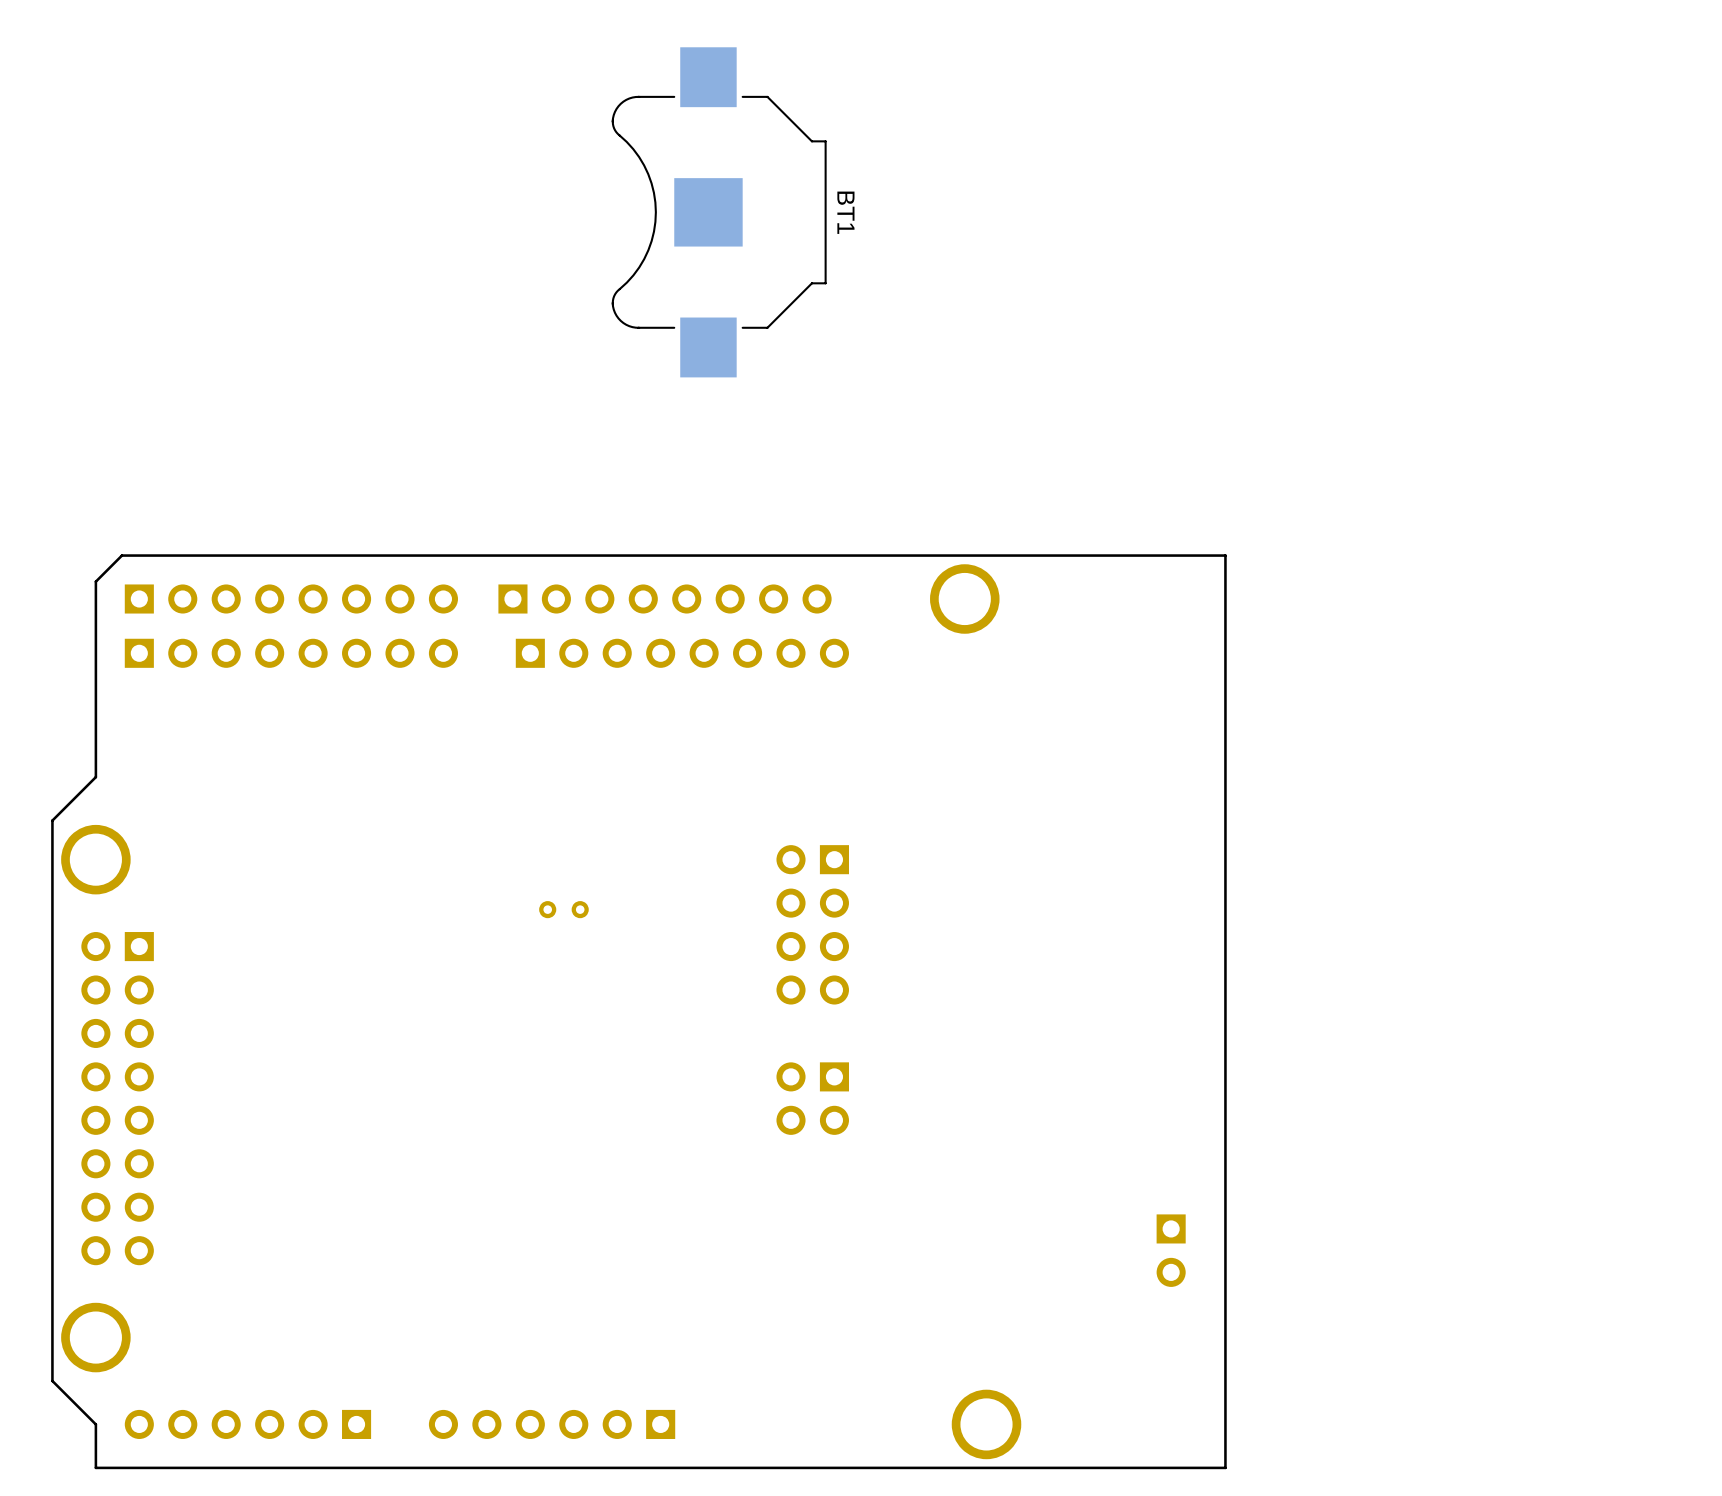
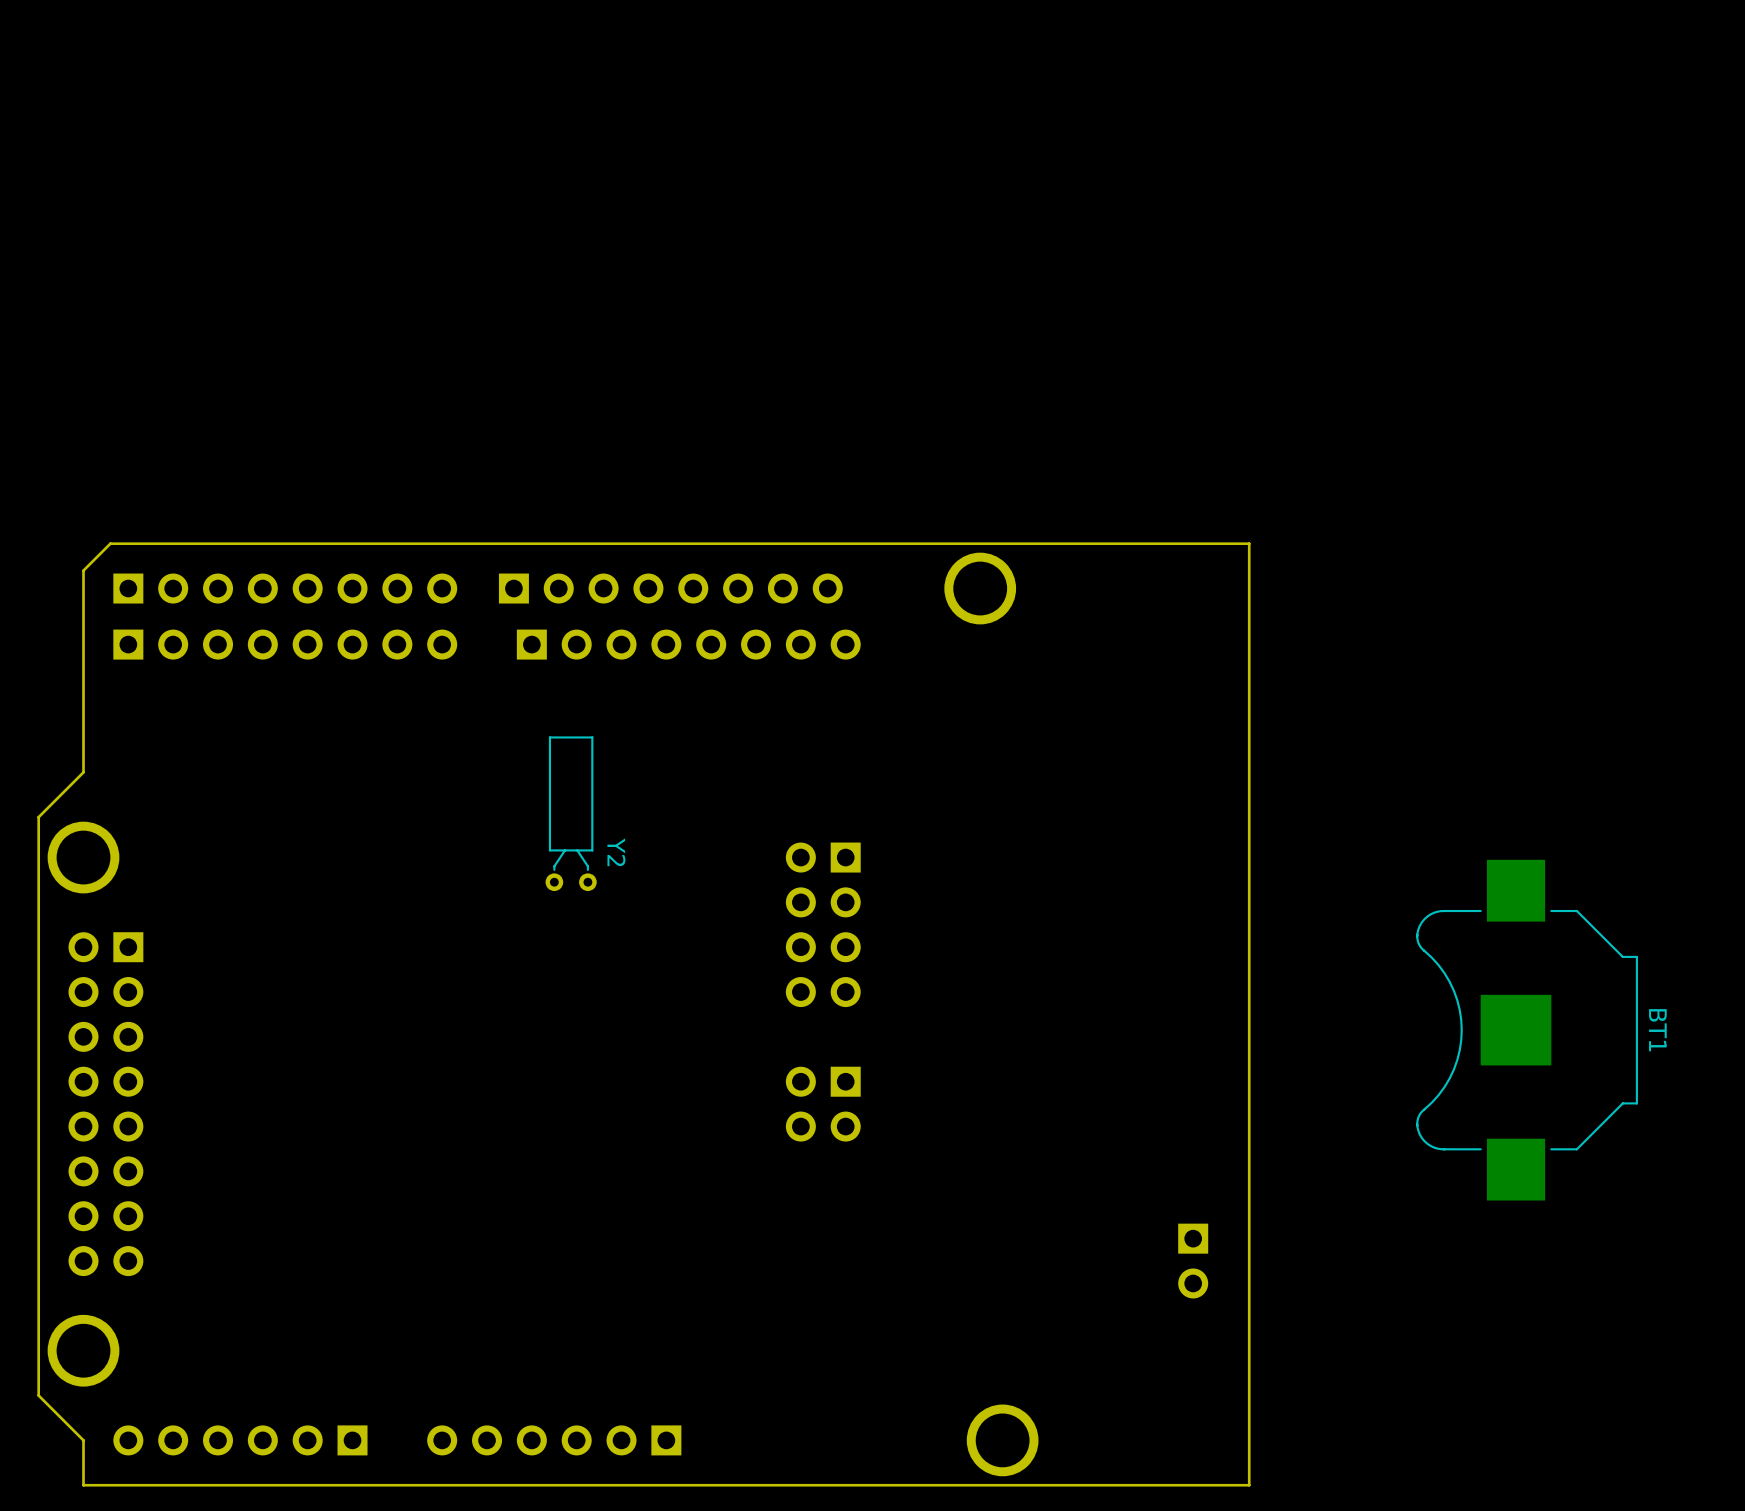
BT1 position: (719, 212) -> (1527, 1030)
Y2 side: top (563, 909) -> bottom (571, 813)

